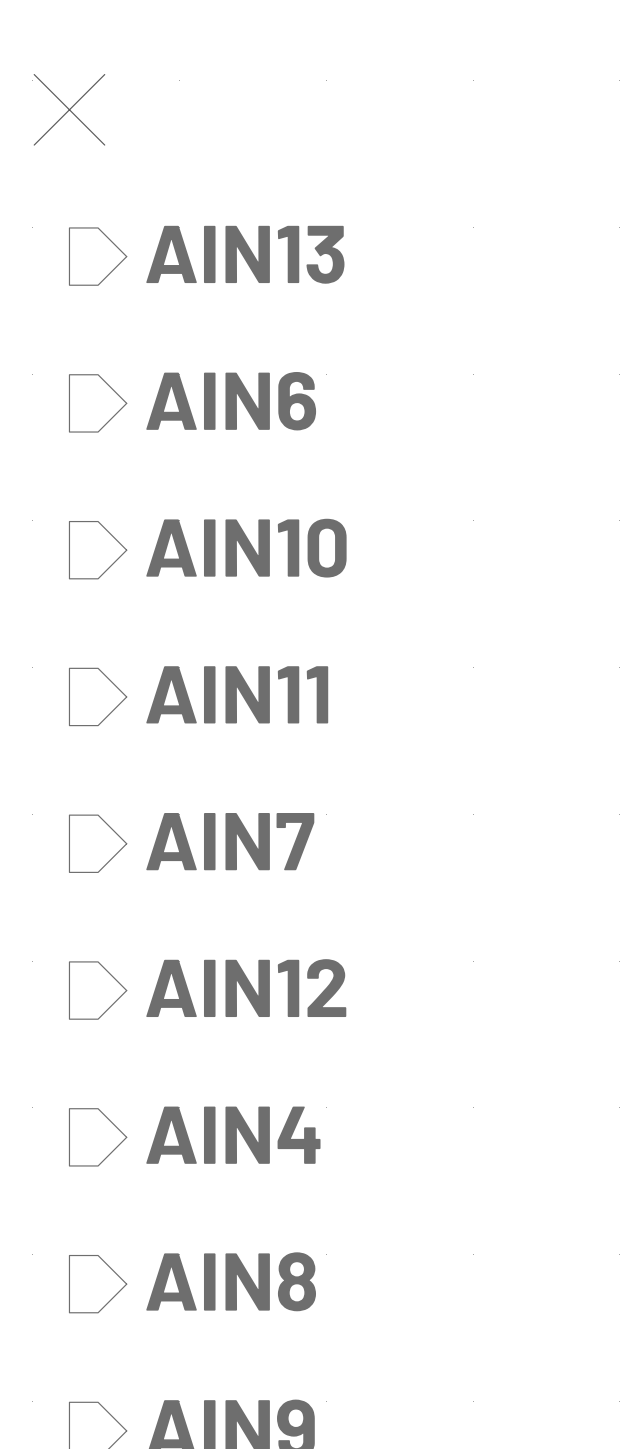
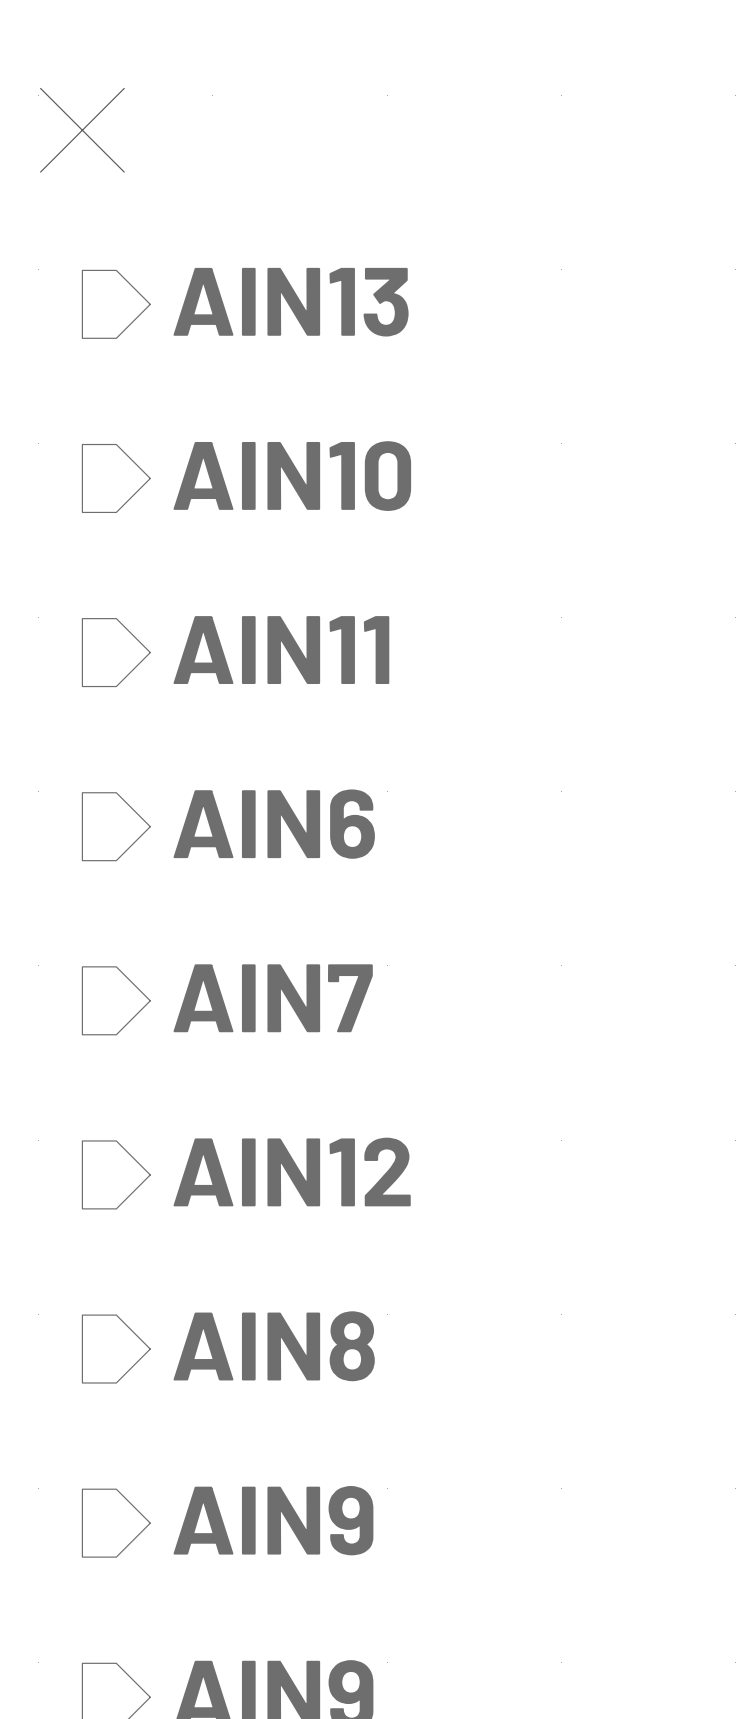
hierarchical label: AIN6 (231, 401) -> AIN10 (292, 476)
hierarchical label: AIN10 (246, 548) -> AIN11 (281, 650)
hierarchical label: AIN11 (237, 694) -> AIN6 (274, 824)
hierarchical label: AIN4 (233, 1135) -> AIN8 (274, 1346)
hierarchical label: AIN8 (231, 1281) -> AIN9 (273, 1520)

